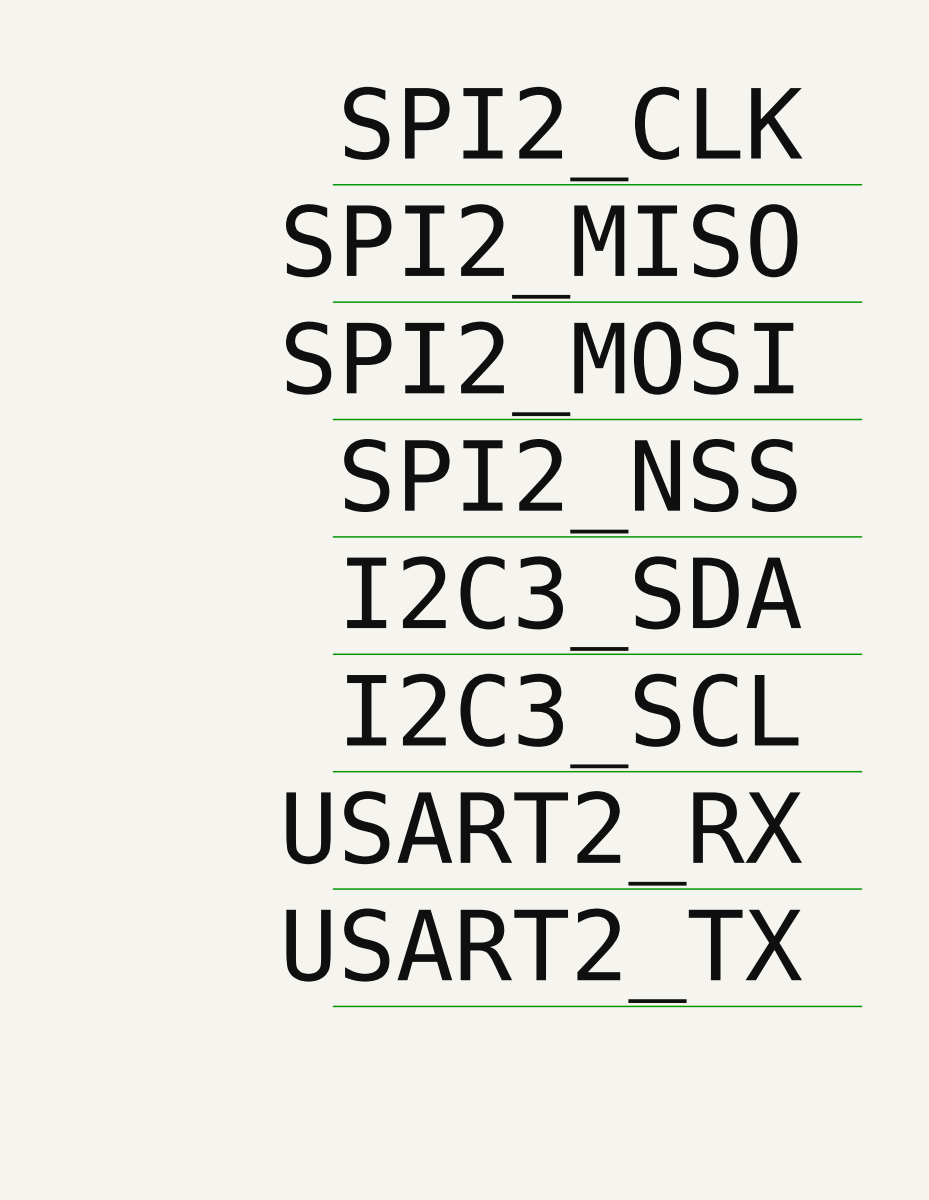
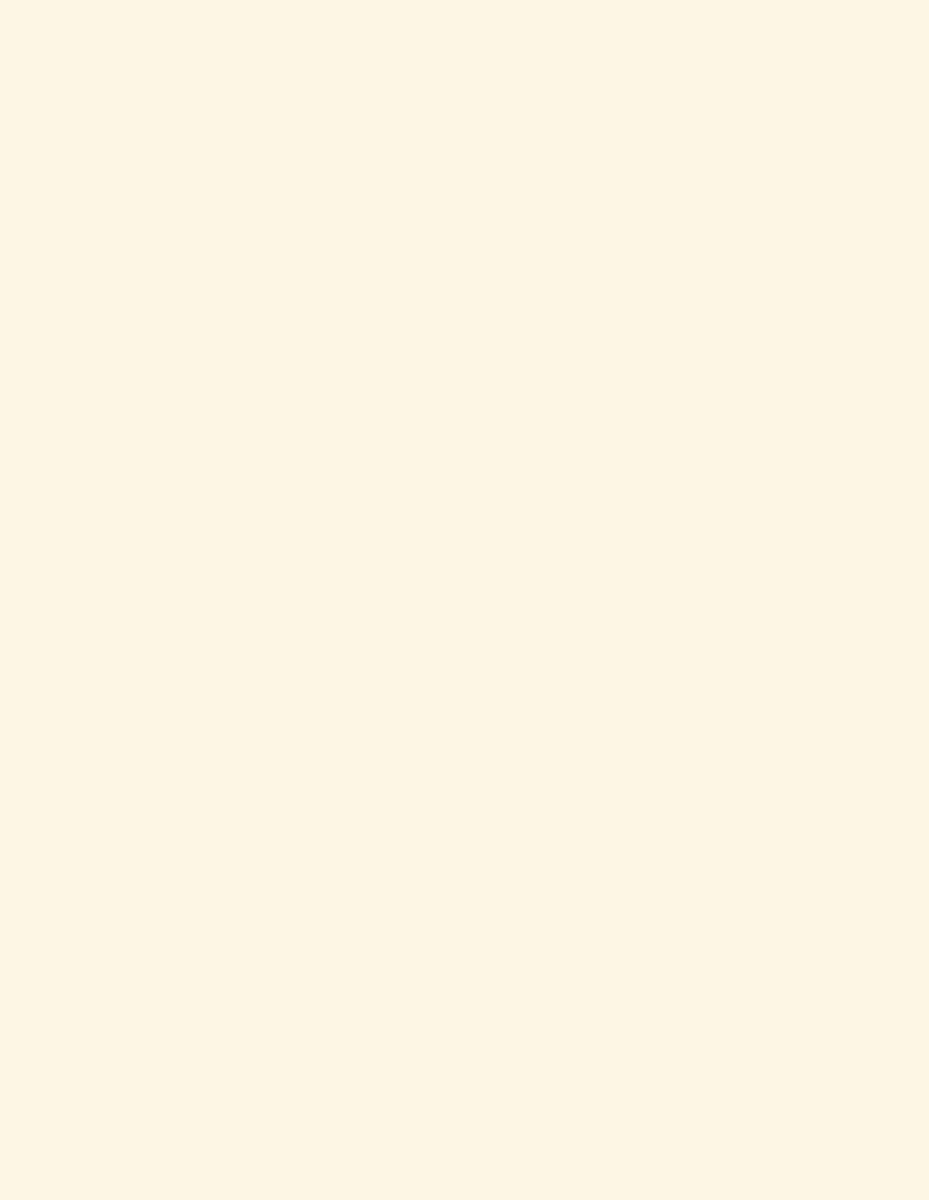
label: SPI2_CLK (573, 134) -> none
wire: (333, 184) (861, 184) -> none
label: SPI2_MISO (541, 251) -> none
wire: (333, 302) (861, 302) -> none
label: SPI2_MOSI (539, 368) -> none
wire: (333, 419) (861, 419) -> none
label: SPI2_NSS (570, 486) -> none
wire: (333, 536) (861, 536) -> none
label: I2C3_SDA (574, 603) -> none
wire: (333, 654) (861, 654) -> none
label: I2C3_SCL (572, 720) -> none
wire: (333, 771) (861, 771) -> none
label: USART2_RX (544, 838) -> none
wire: (333, 889) (861, 889) -> none
label: USART2_TX (544, 955) -> none
wire: (333, 1006) (861, 1006) -> none

